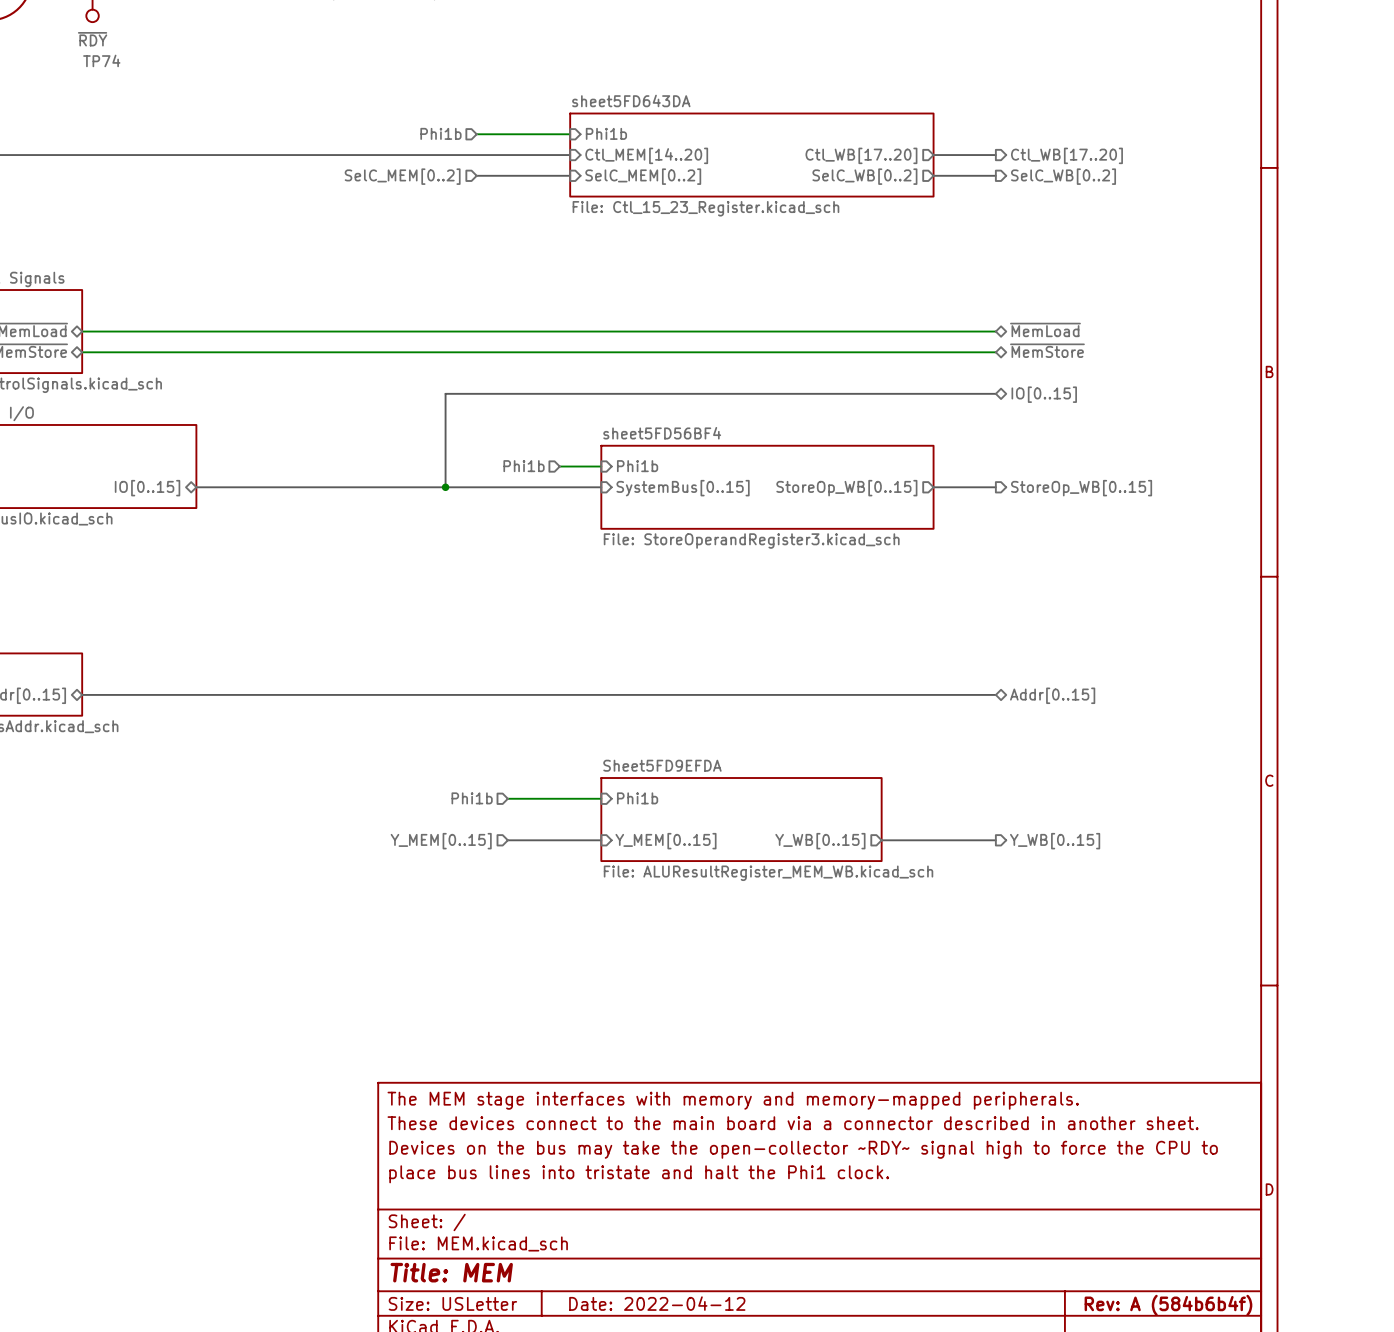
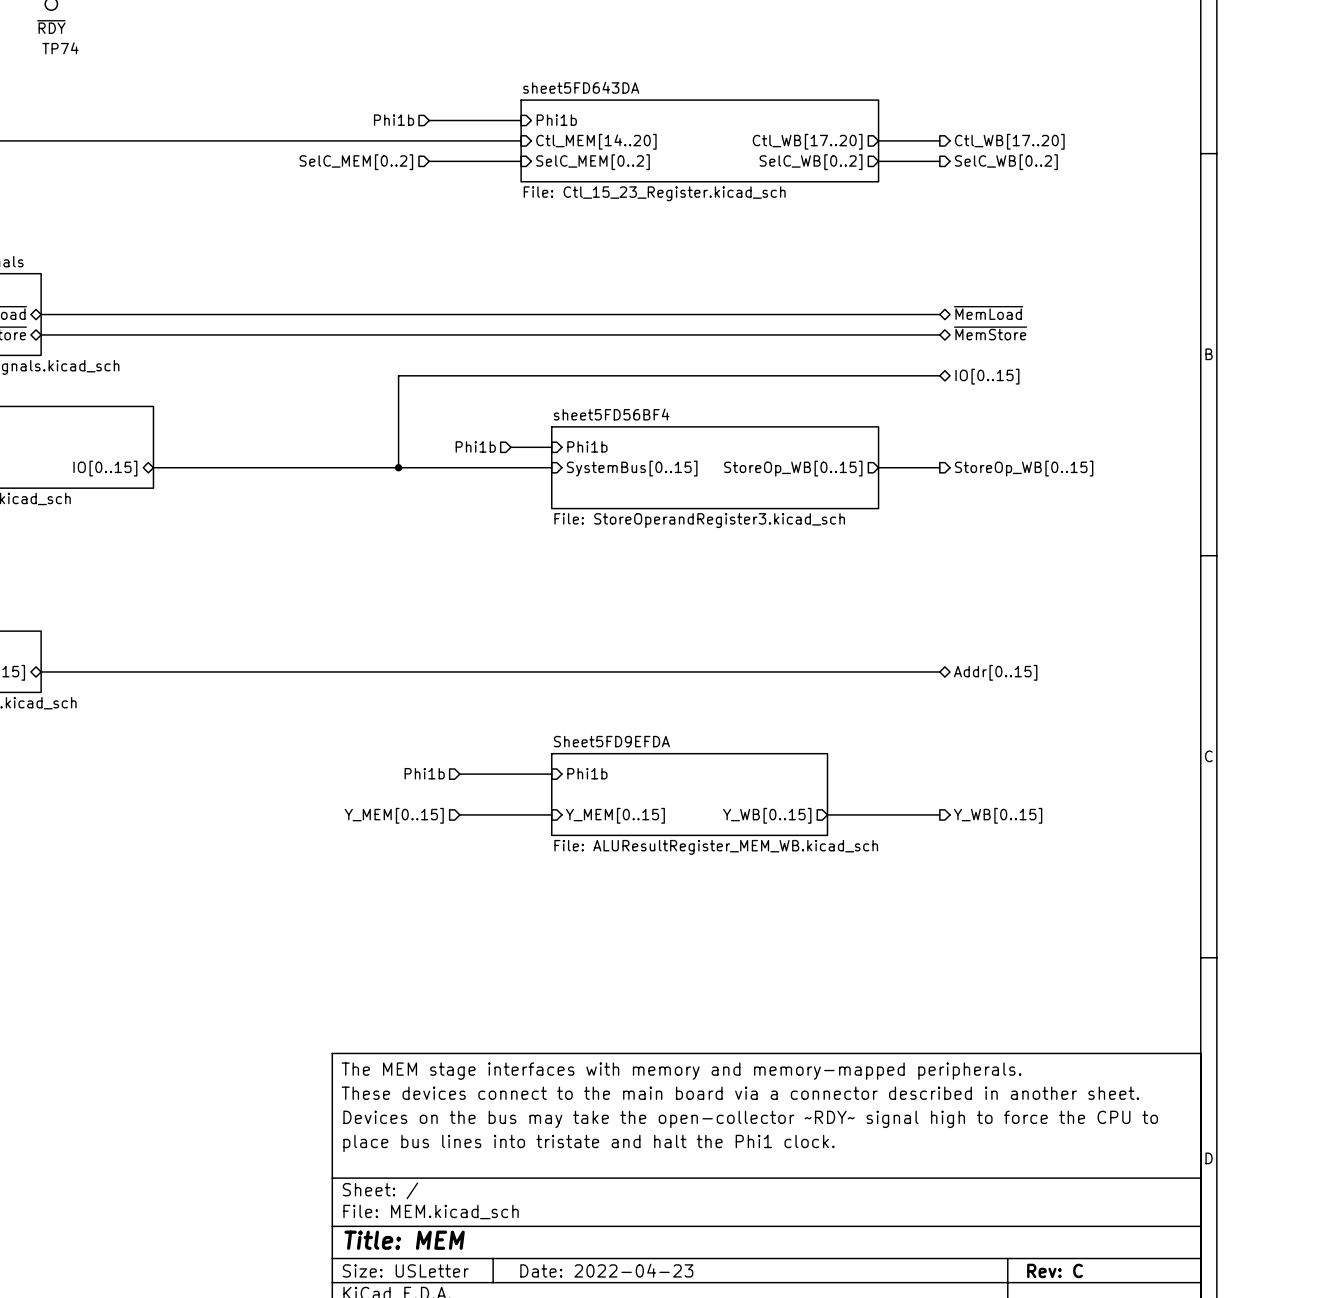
title block: Date: 2022-04-12 (657, 1303) -> Date: 2022-04-23 (606, 1270)
title block: Rev: A (584b6b4f) (1168, 1305) -> Rev: C (1055, 1270)

